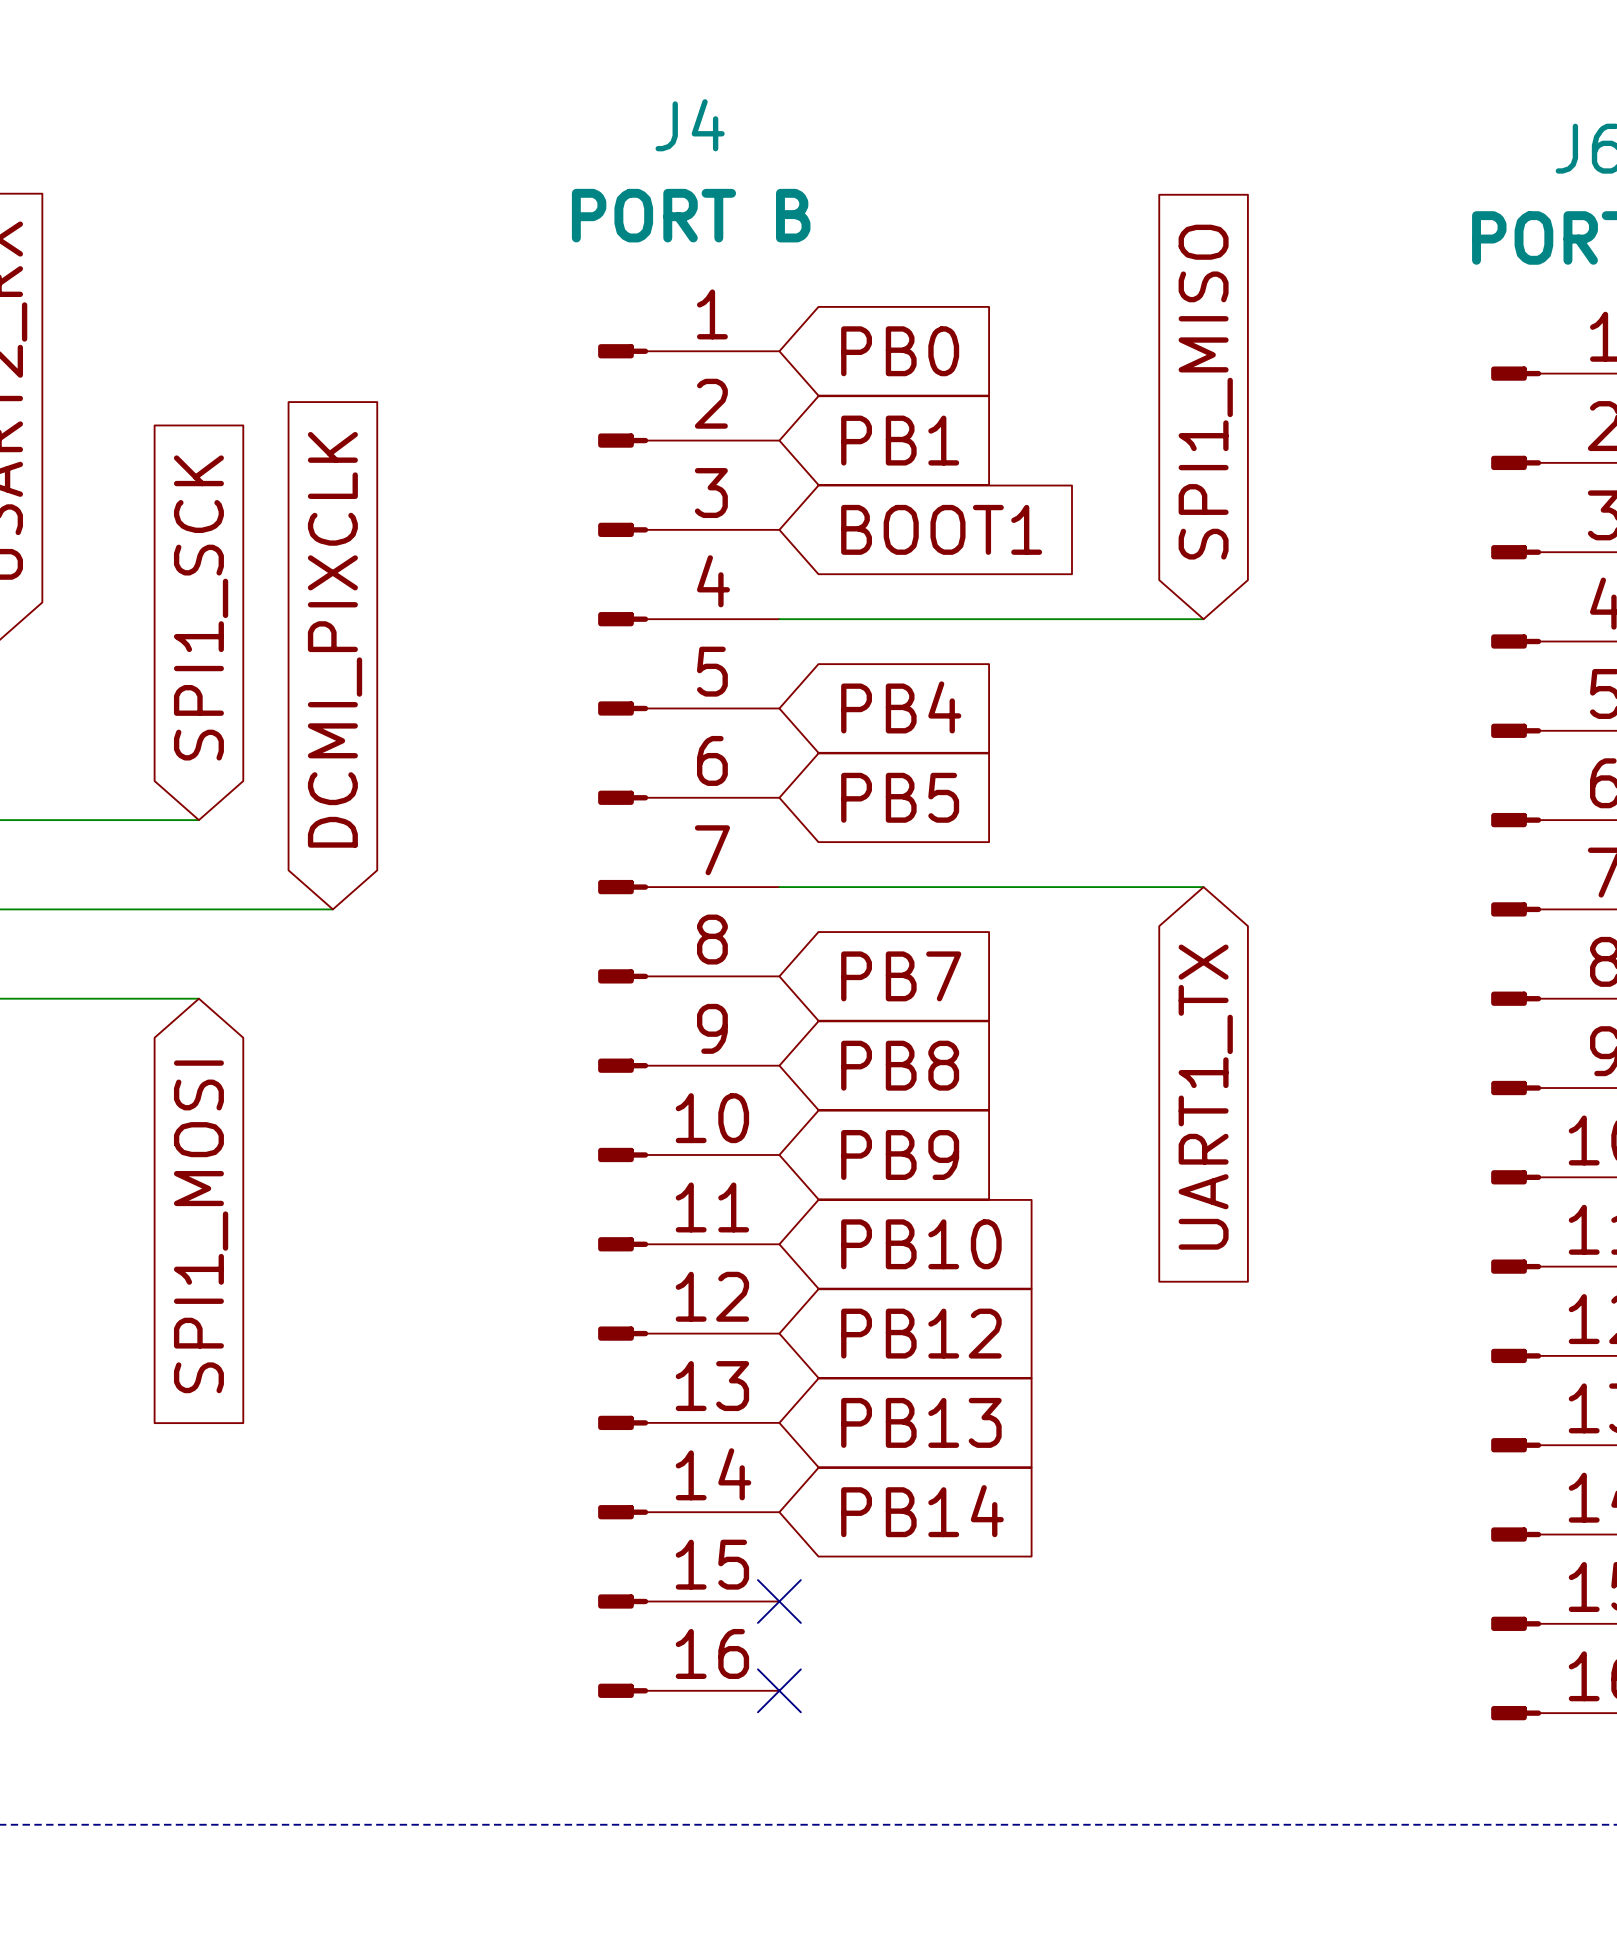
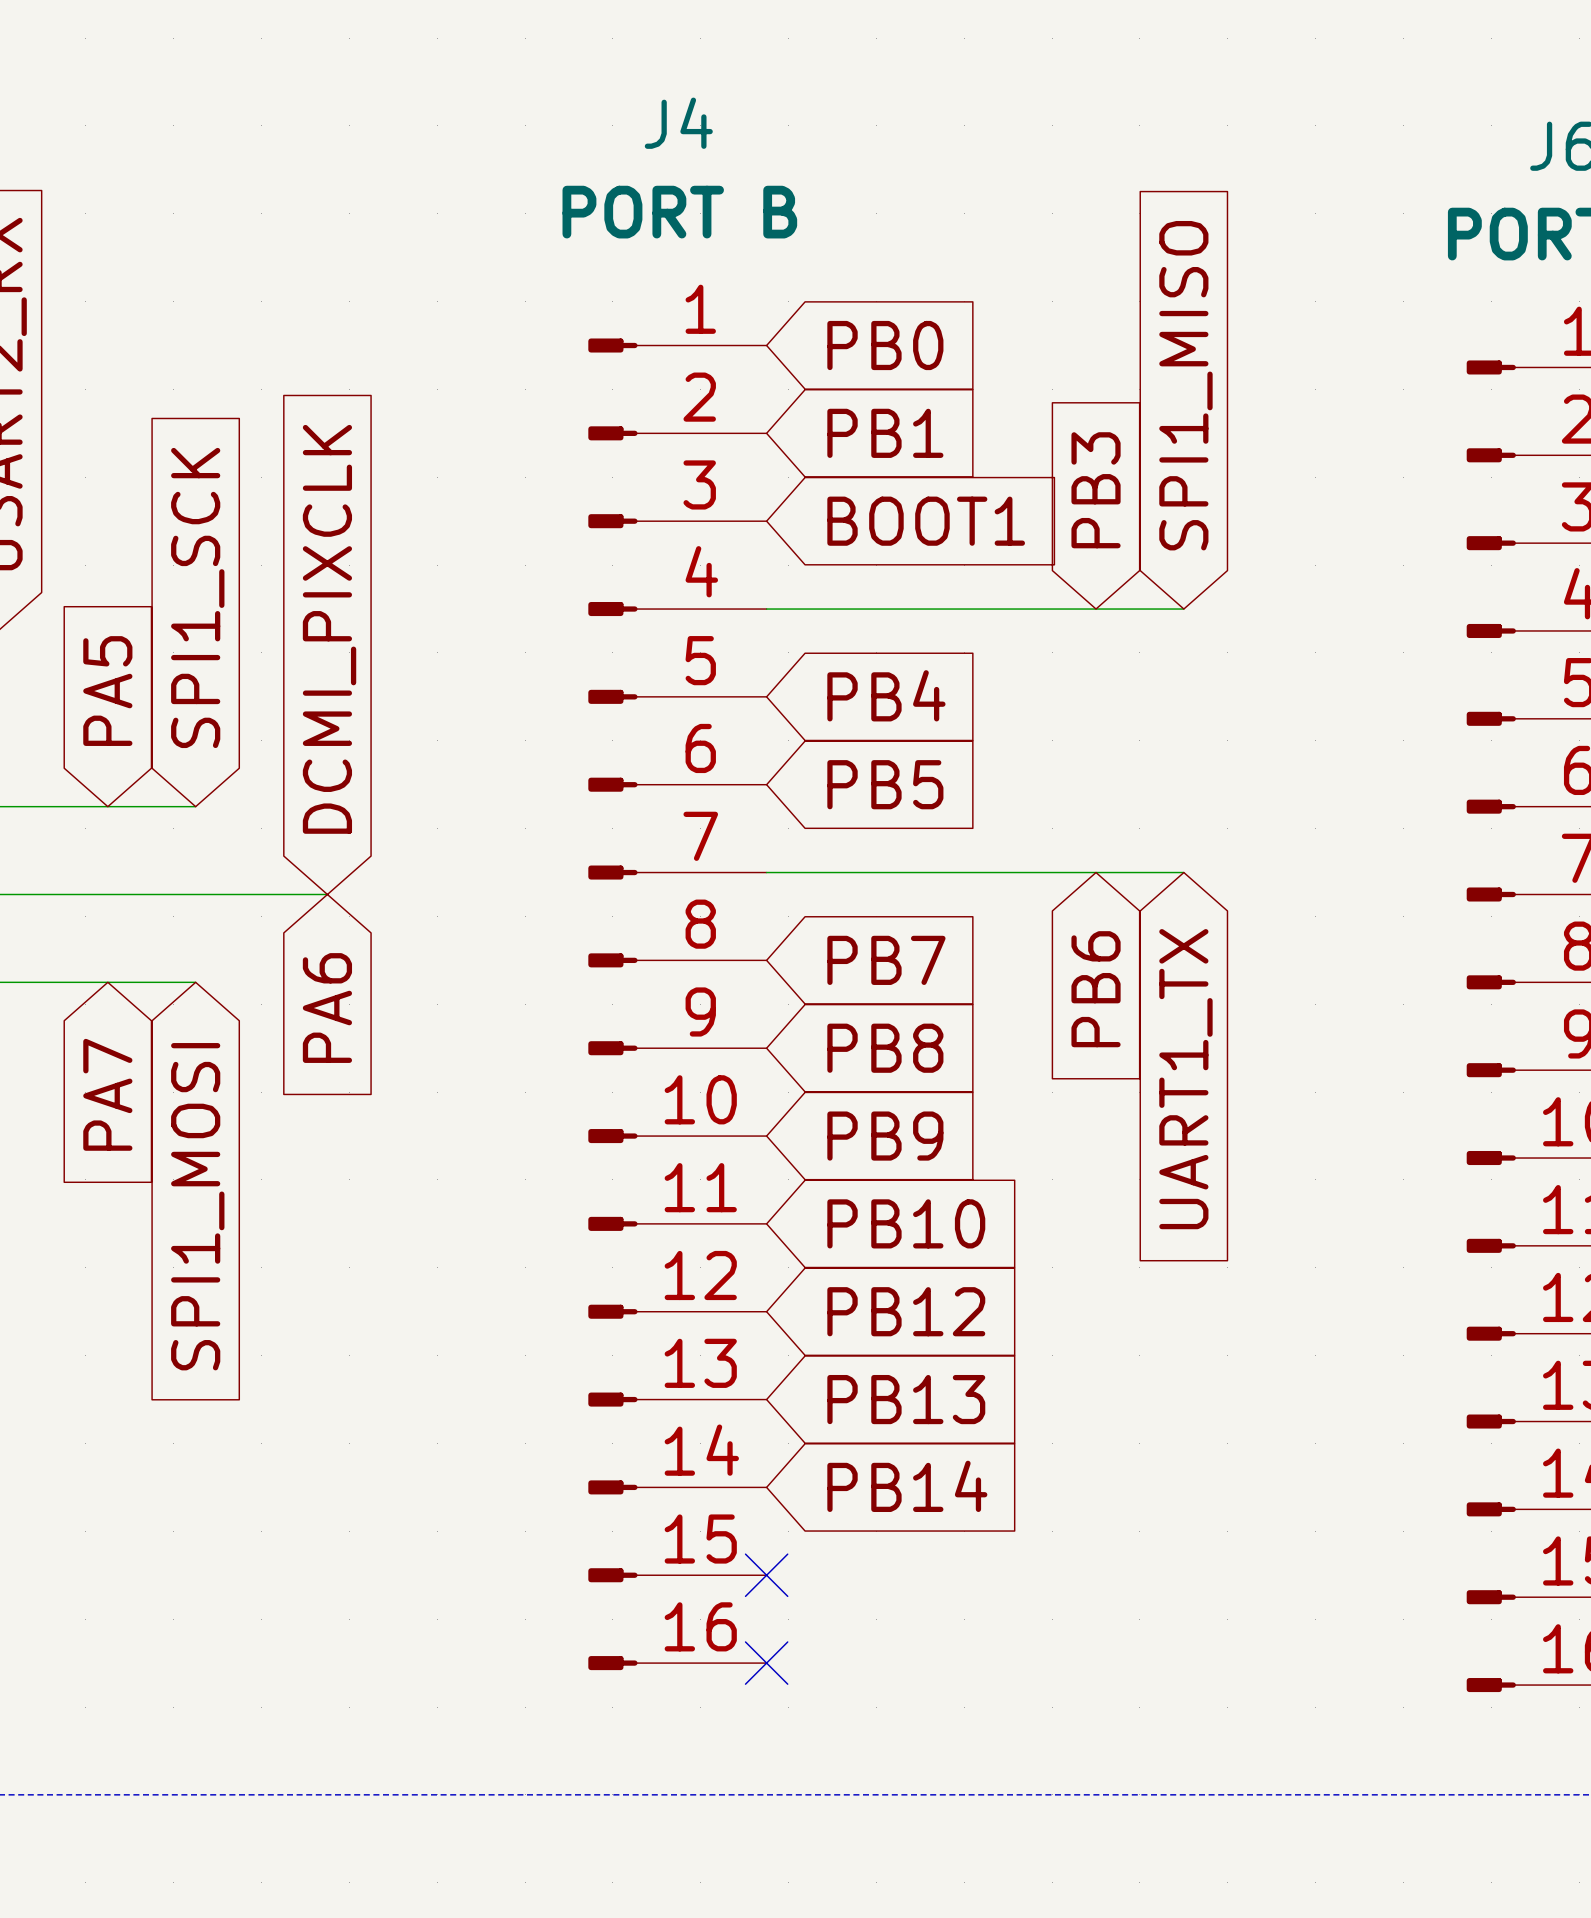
global label: none -> PB3 (1096, 490)
global label: none -> PA5 (107, 691)
global label: none -> PB6 (1096, 989)
global label: none -> PA6 (327, 1008)
global label: none -> PA7 (107, 1094)

